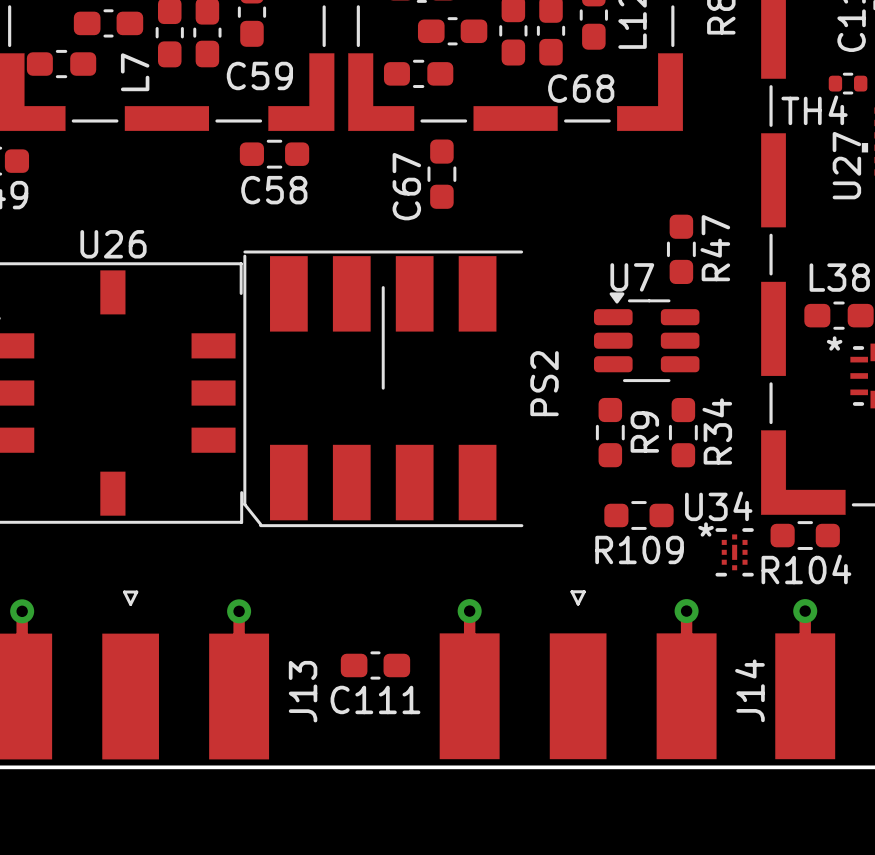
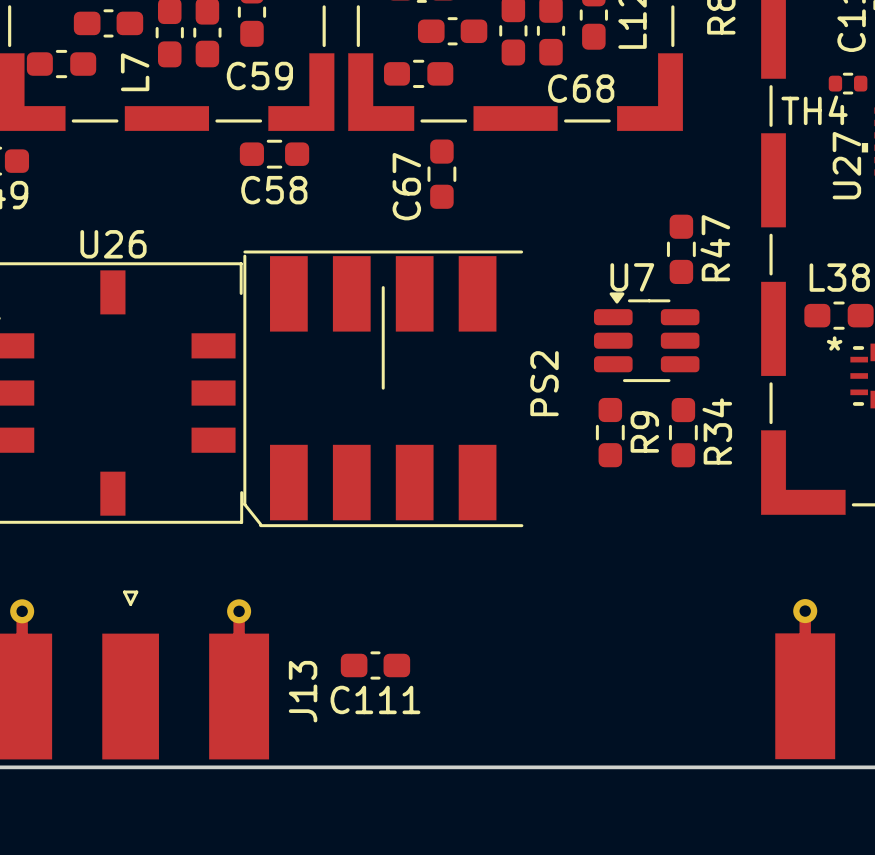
R109: (638, 515) -> none
R104: (805, 535) -> none
U34: (734, 552) -> none
J14: (578, 674) -> none

